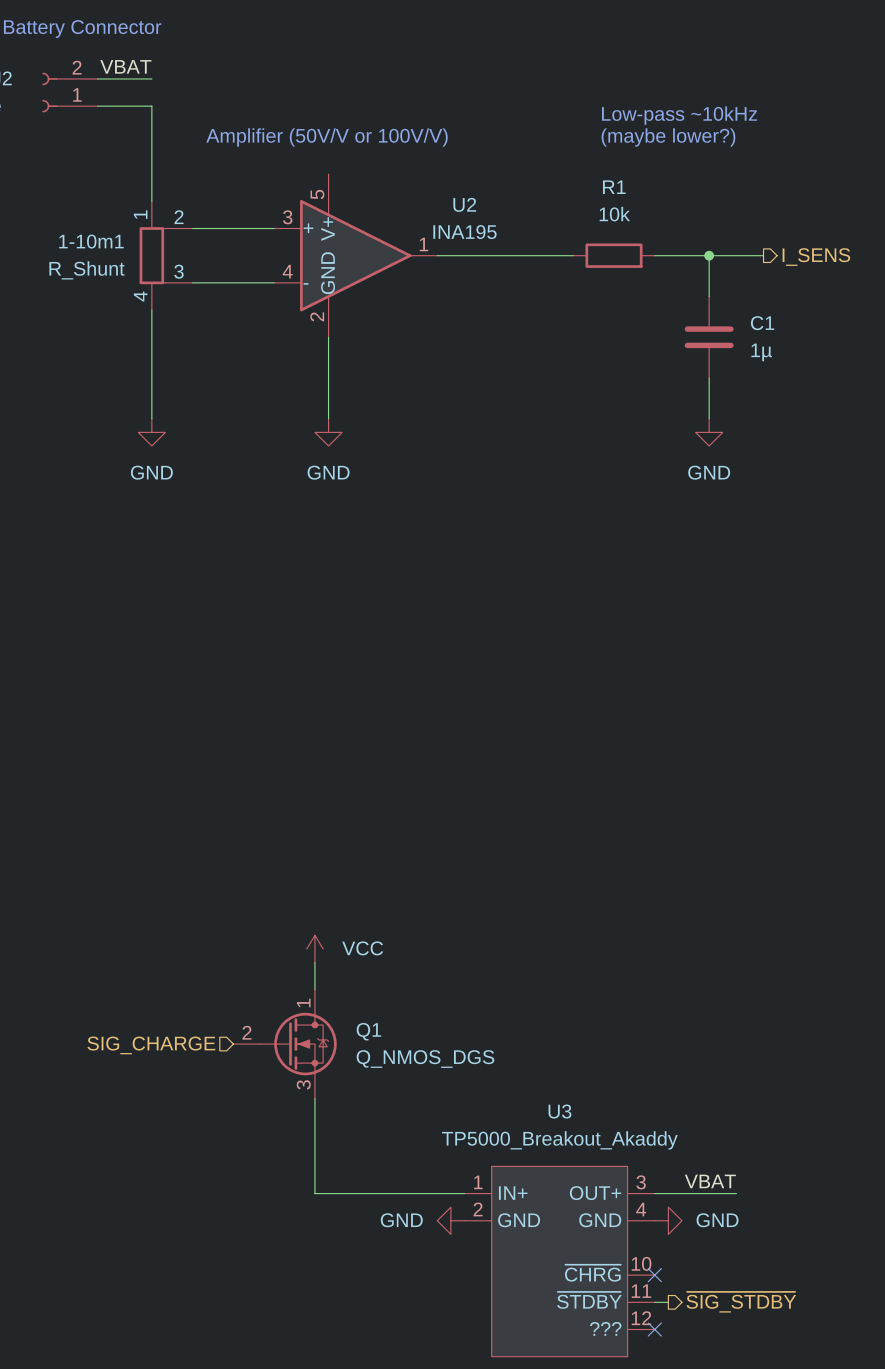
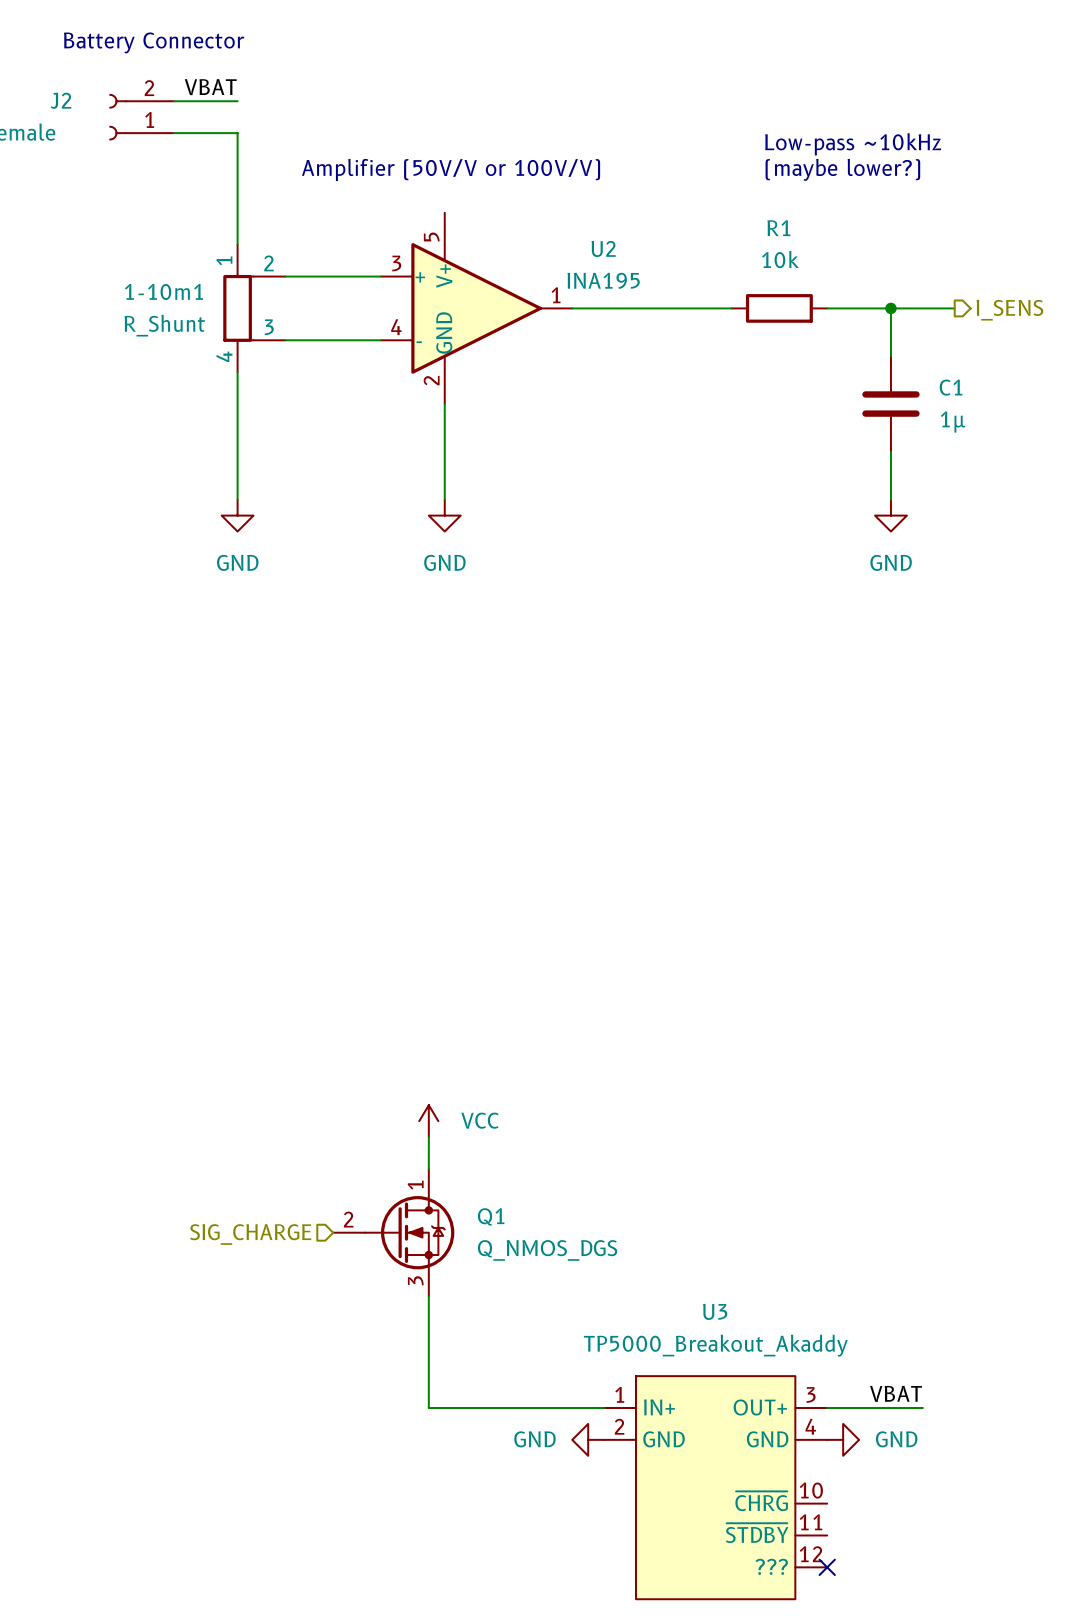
no-connect mark: (654, 1275) -> none
wire: (654, 1302) (668, 1302) -> none
hierarchical label: ~{SIG_STDBY} (741, 1302) -> none

